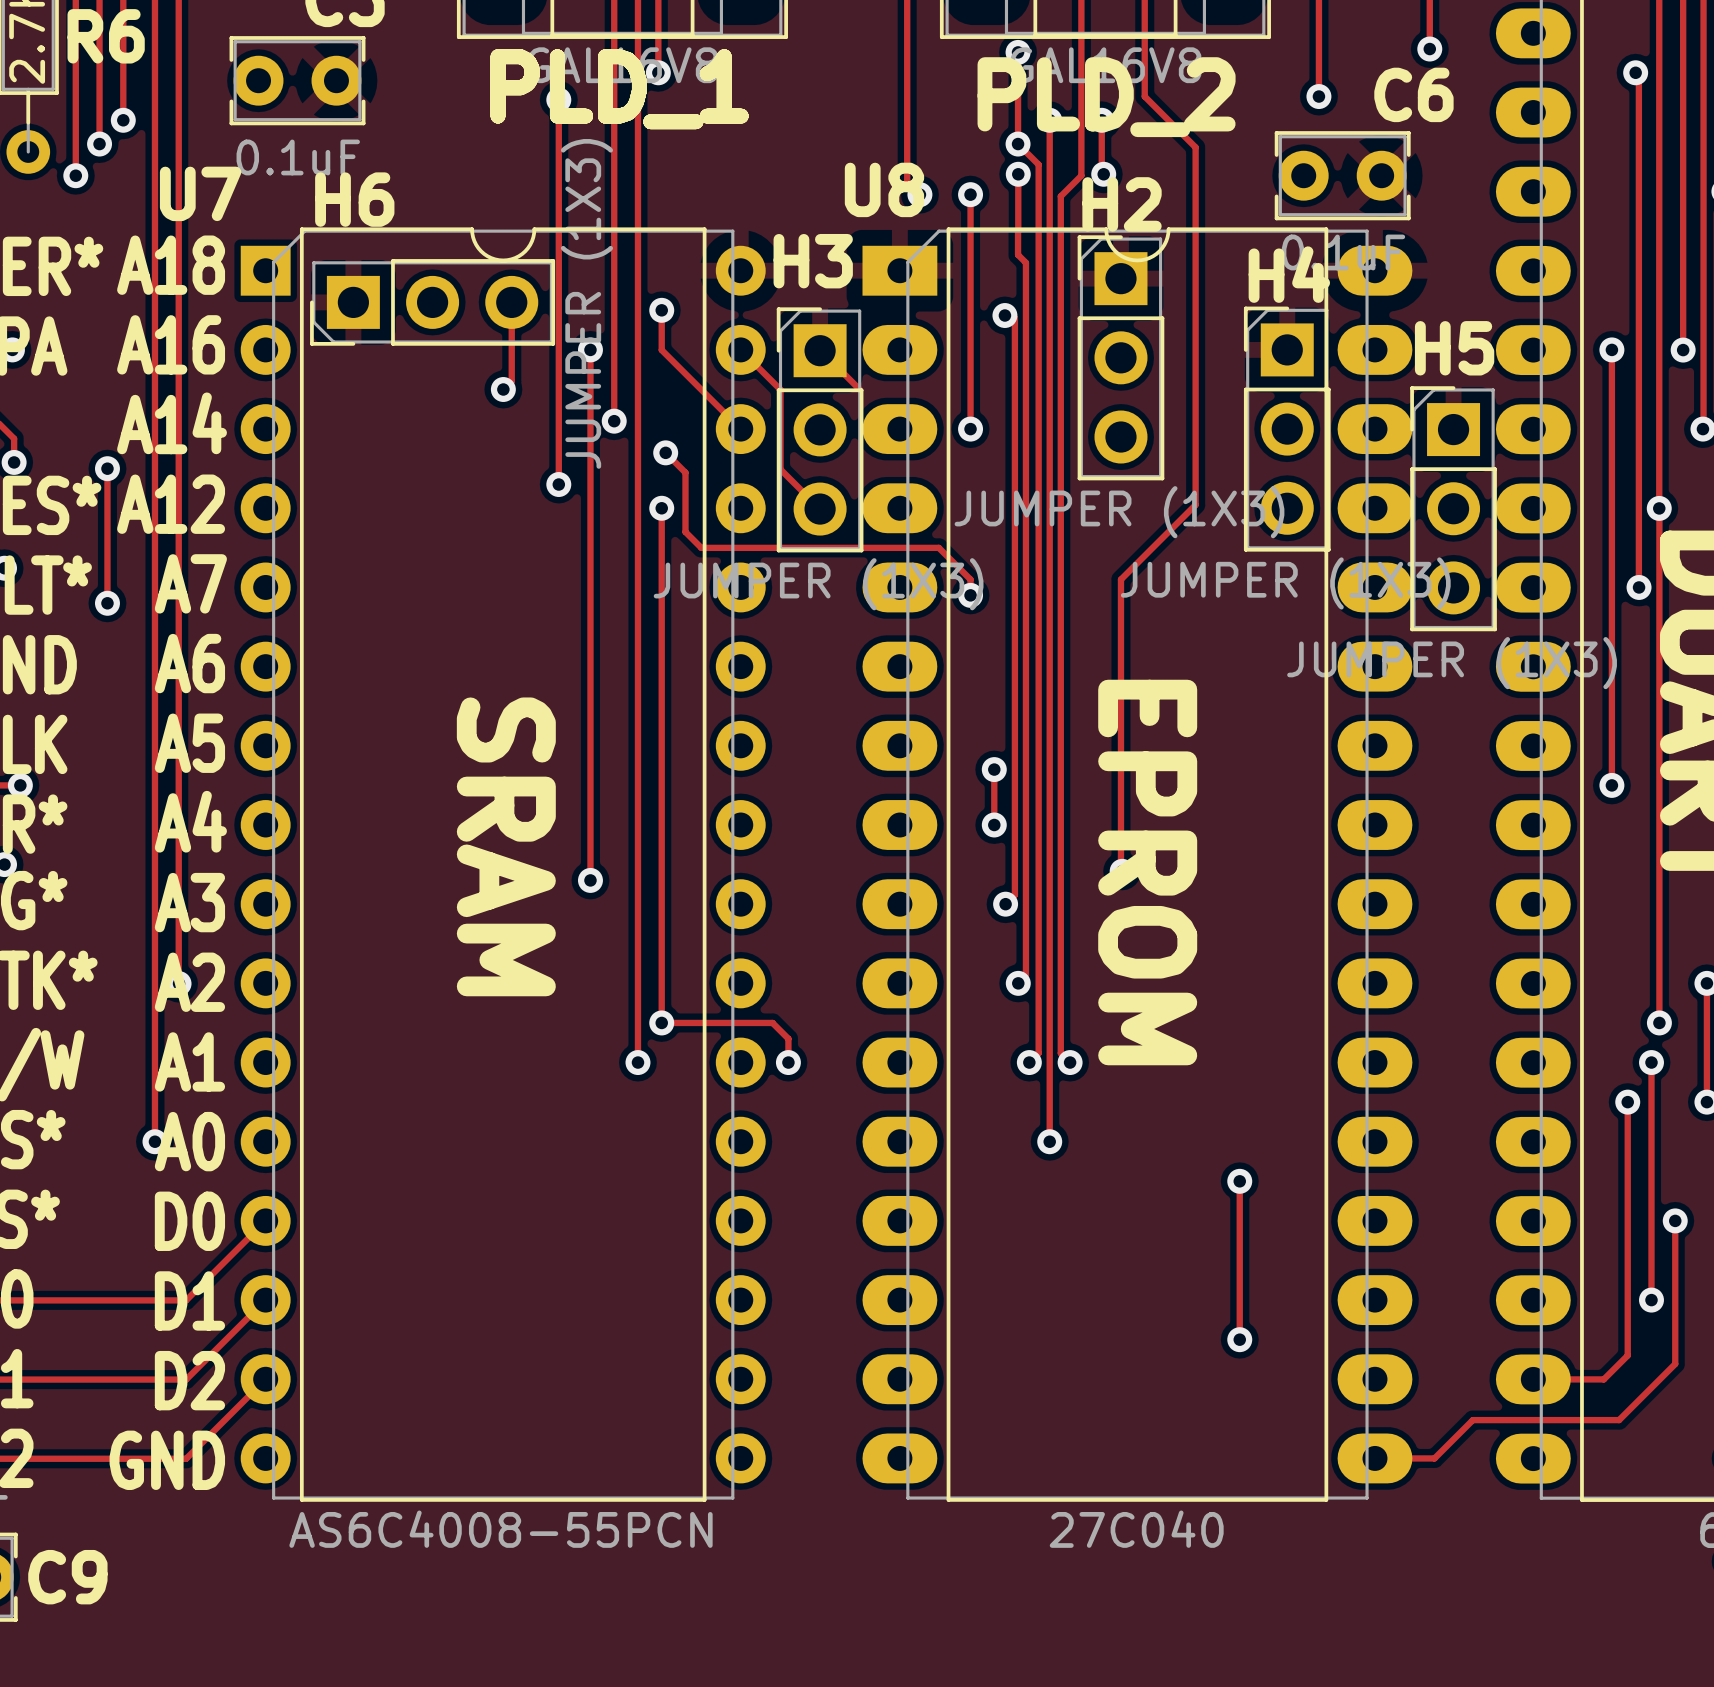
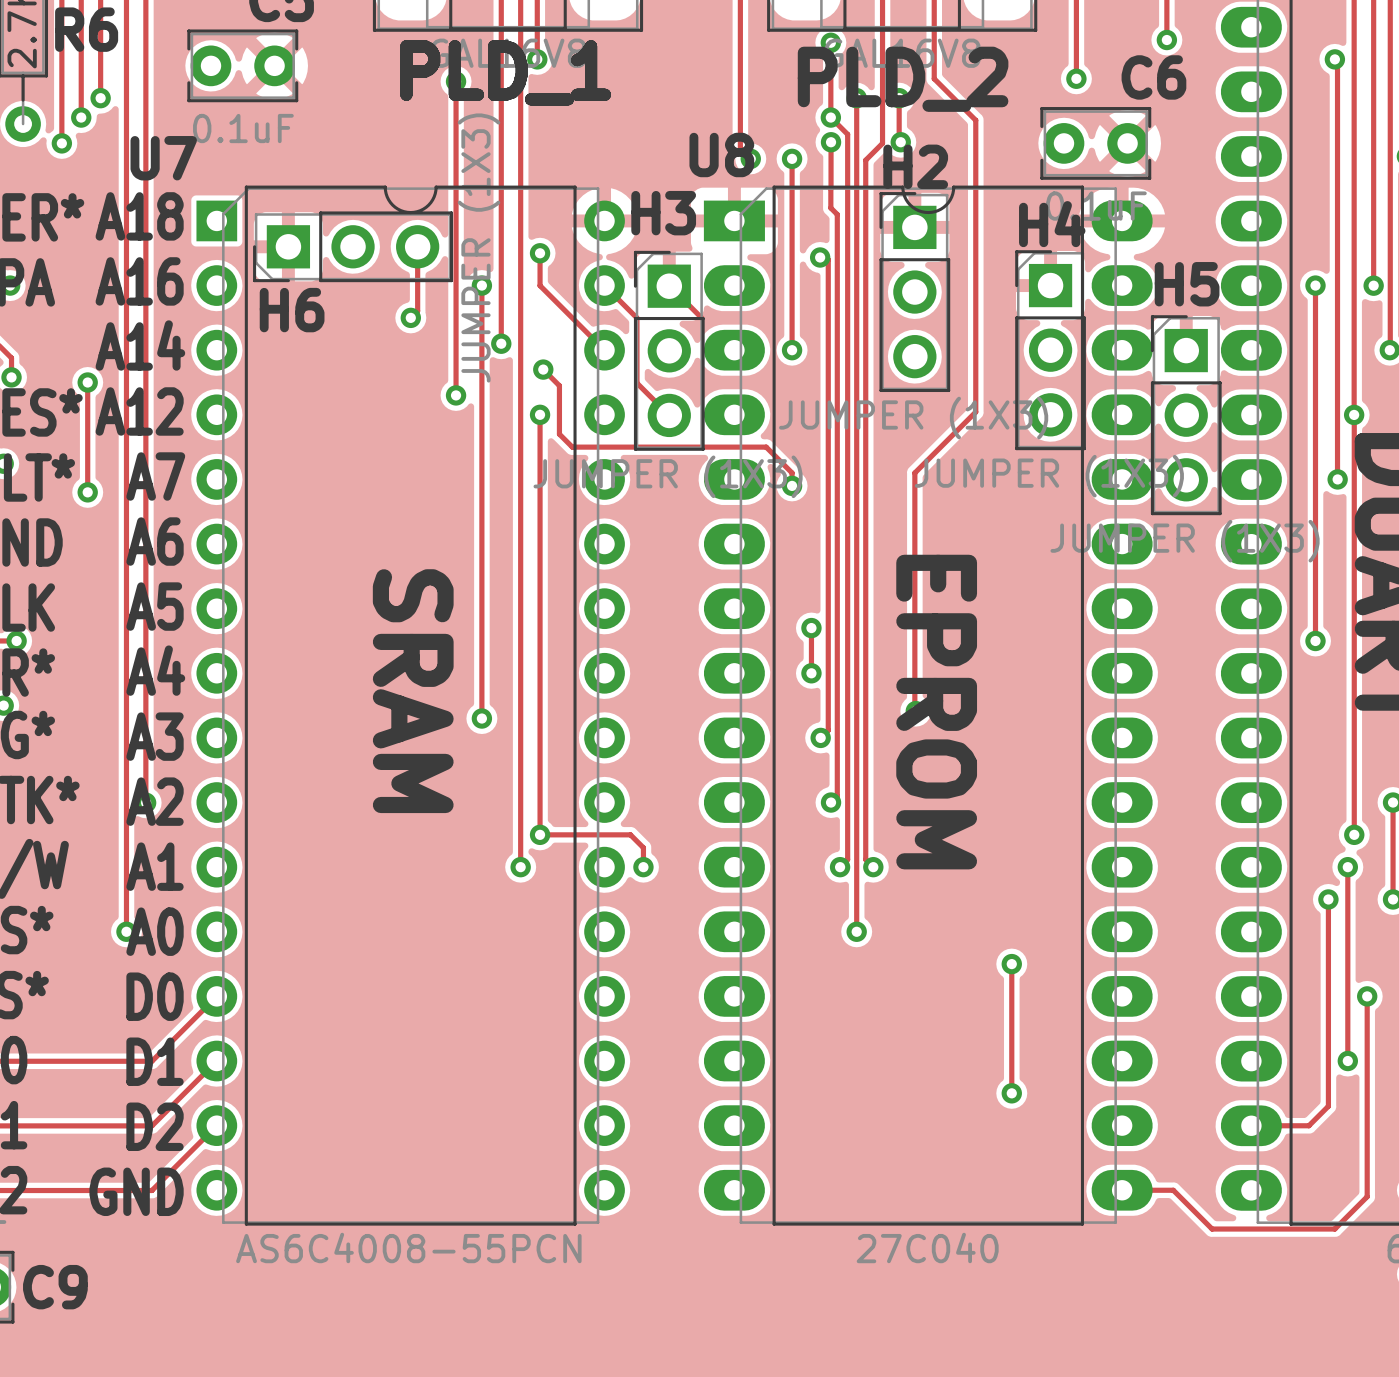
H6 name position: H6 (354, 199) -> H6 (292, 310)
track: (1675, 1363) (1619, 1420) (1472, 1420) (1434, 1458) -> (1367, 1113) (1367, 1196) (1334, 1229) (1212, 1229) (1173, 1190) (1170, 1190)

